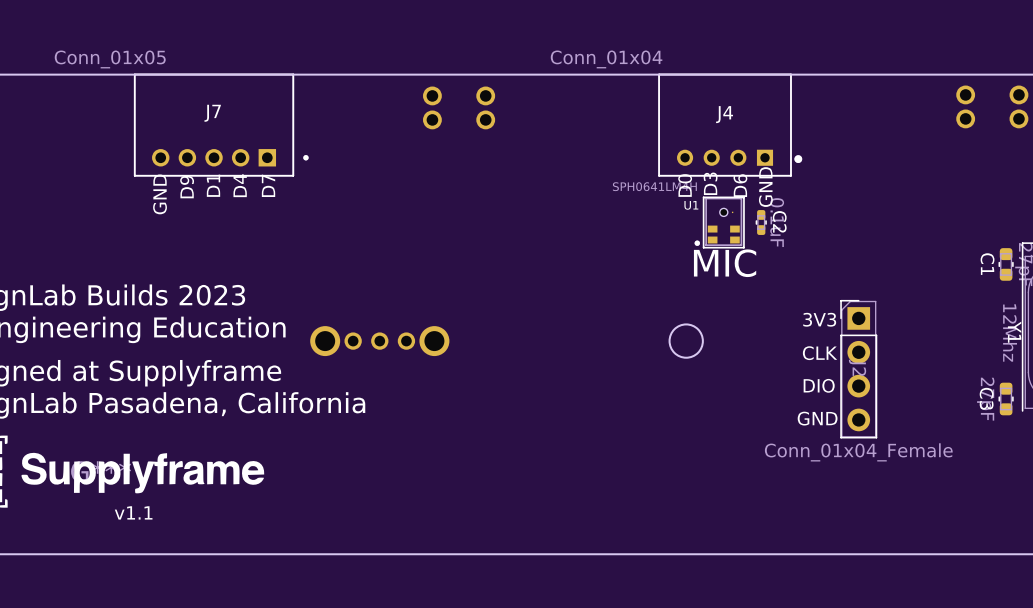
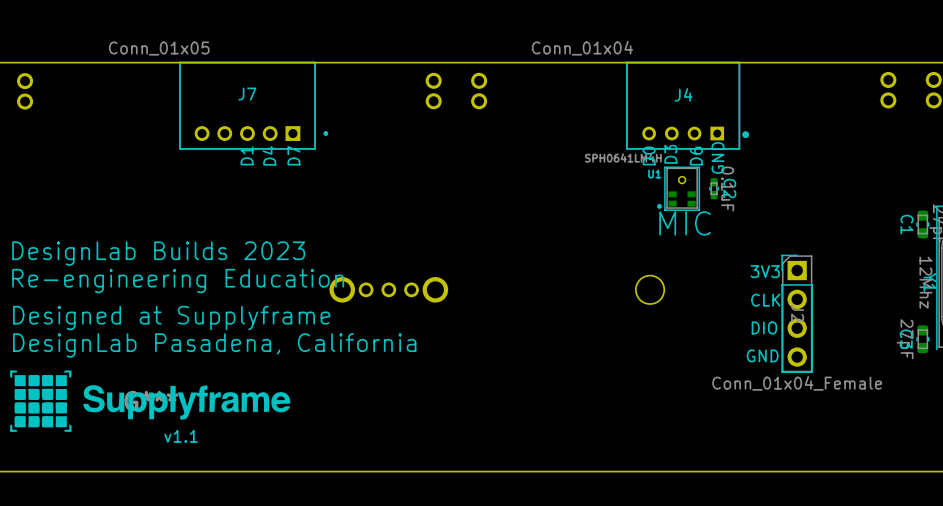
text: D9 (187, 187) -> none
text: GND (160, 194) -> none

